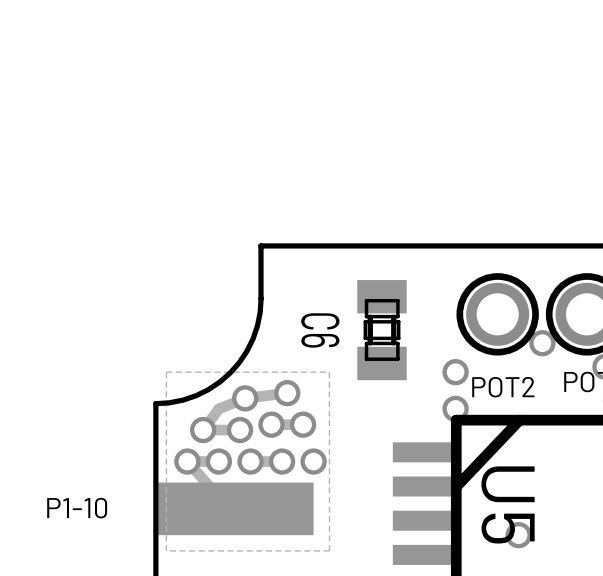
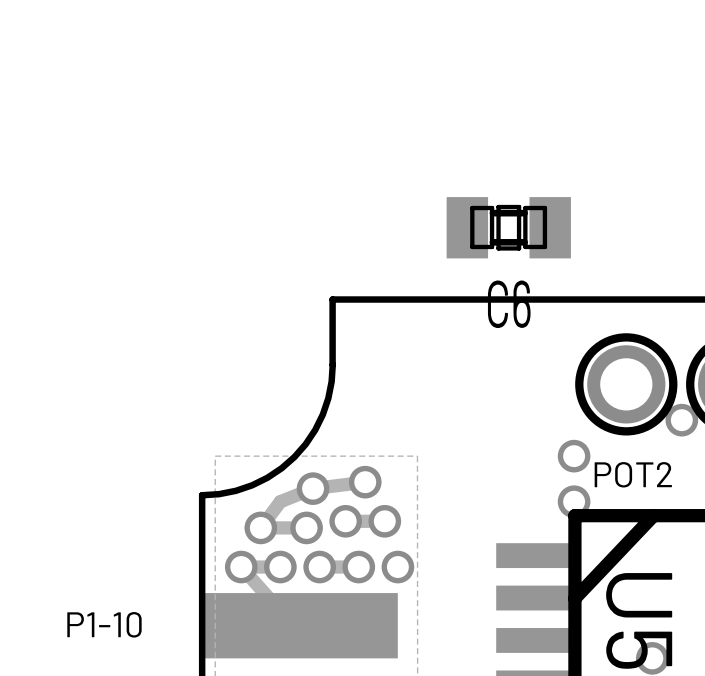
C6 rotation: 0° (382, 330) -> 90° clockwise (508, 227)
C6 position: (382, 330) -> (508, 227)

